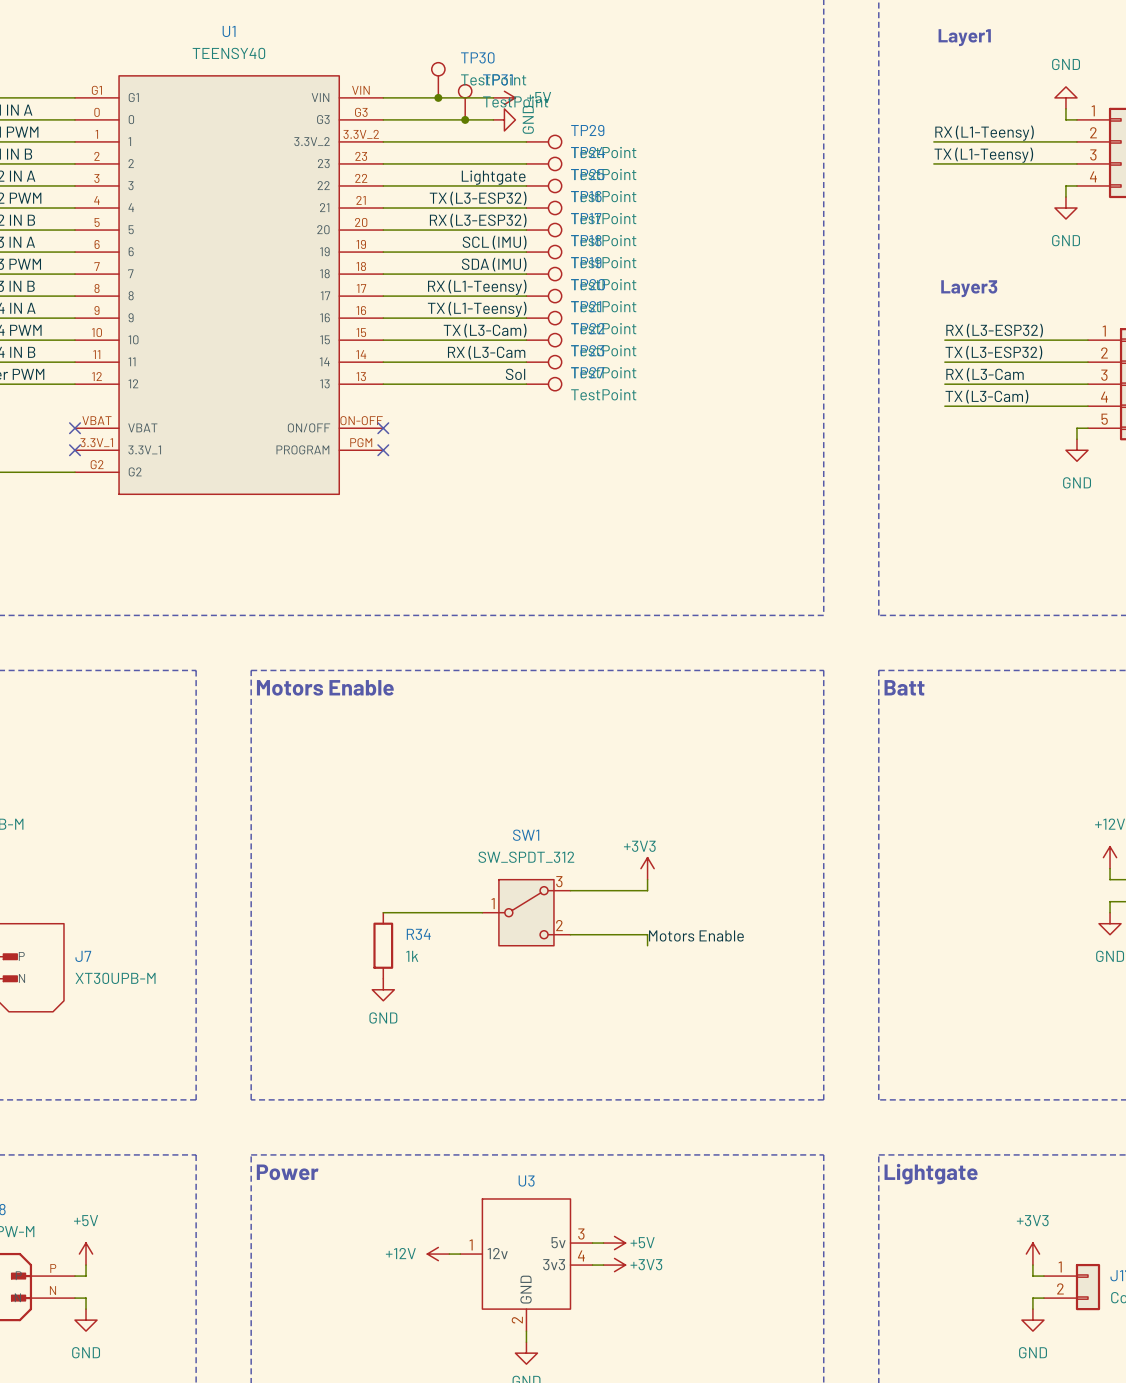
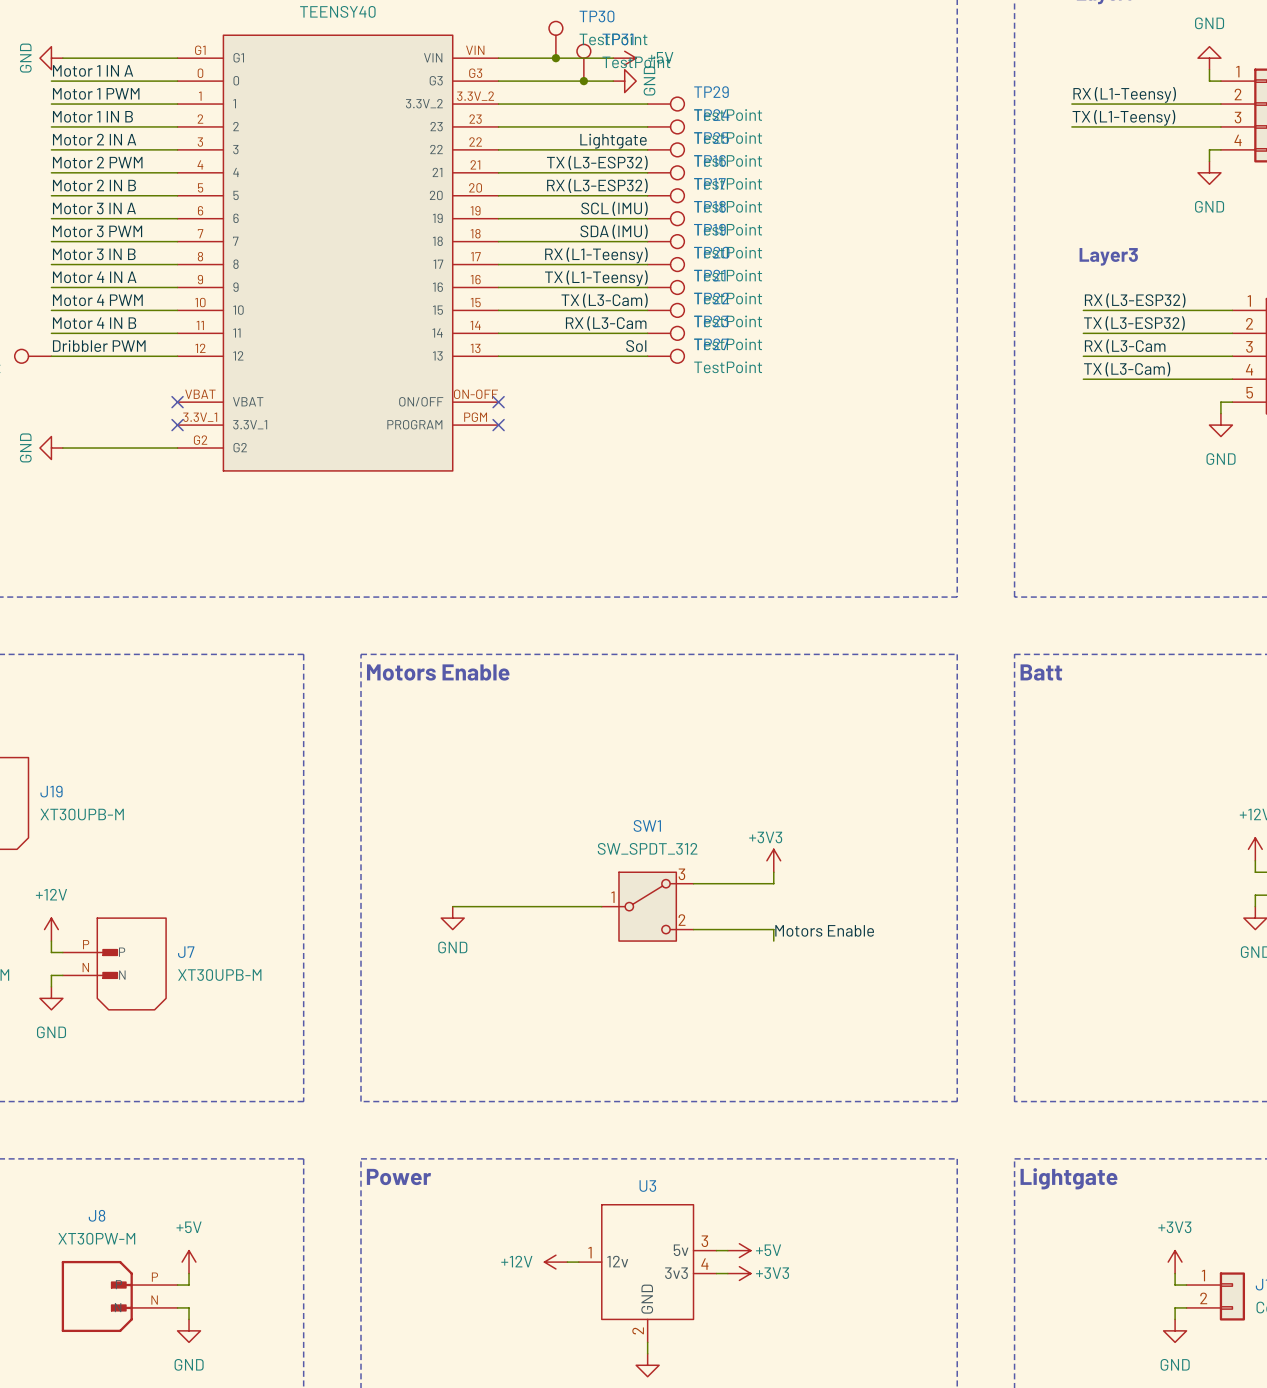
wire: none -> (452, 906) (498, 906)
R34: 1k (383, 945) -> none
power symbol position: GND (383, 989) -> GND (452, 918)

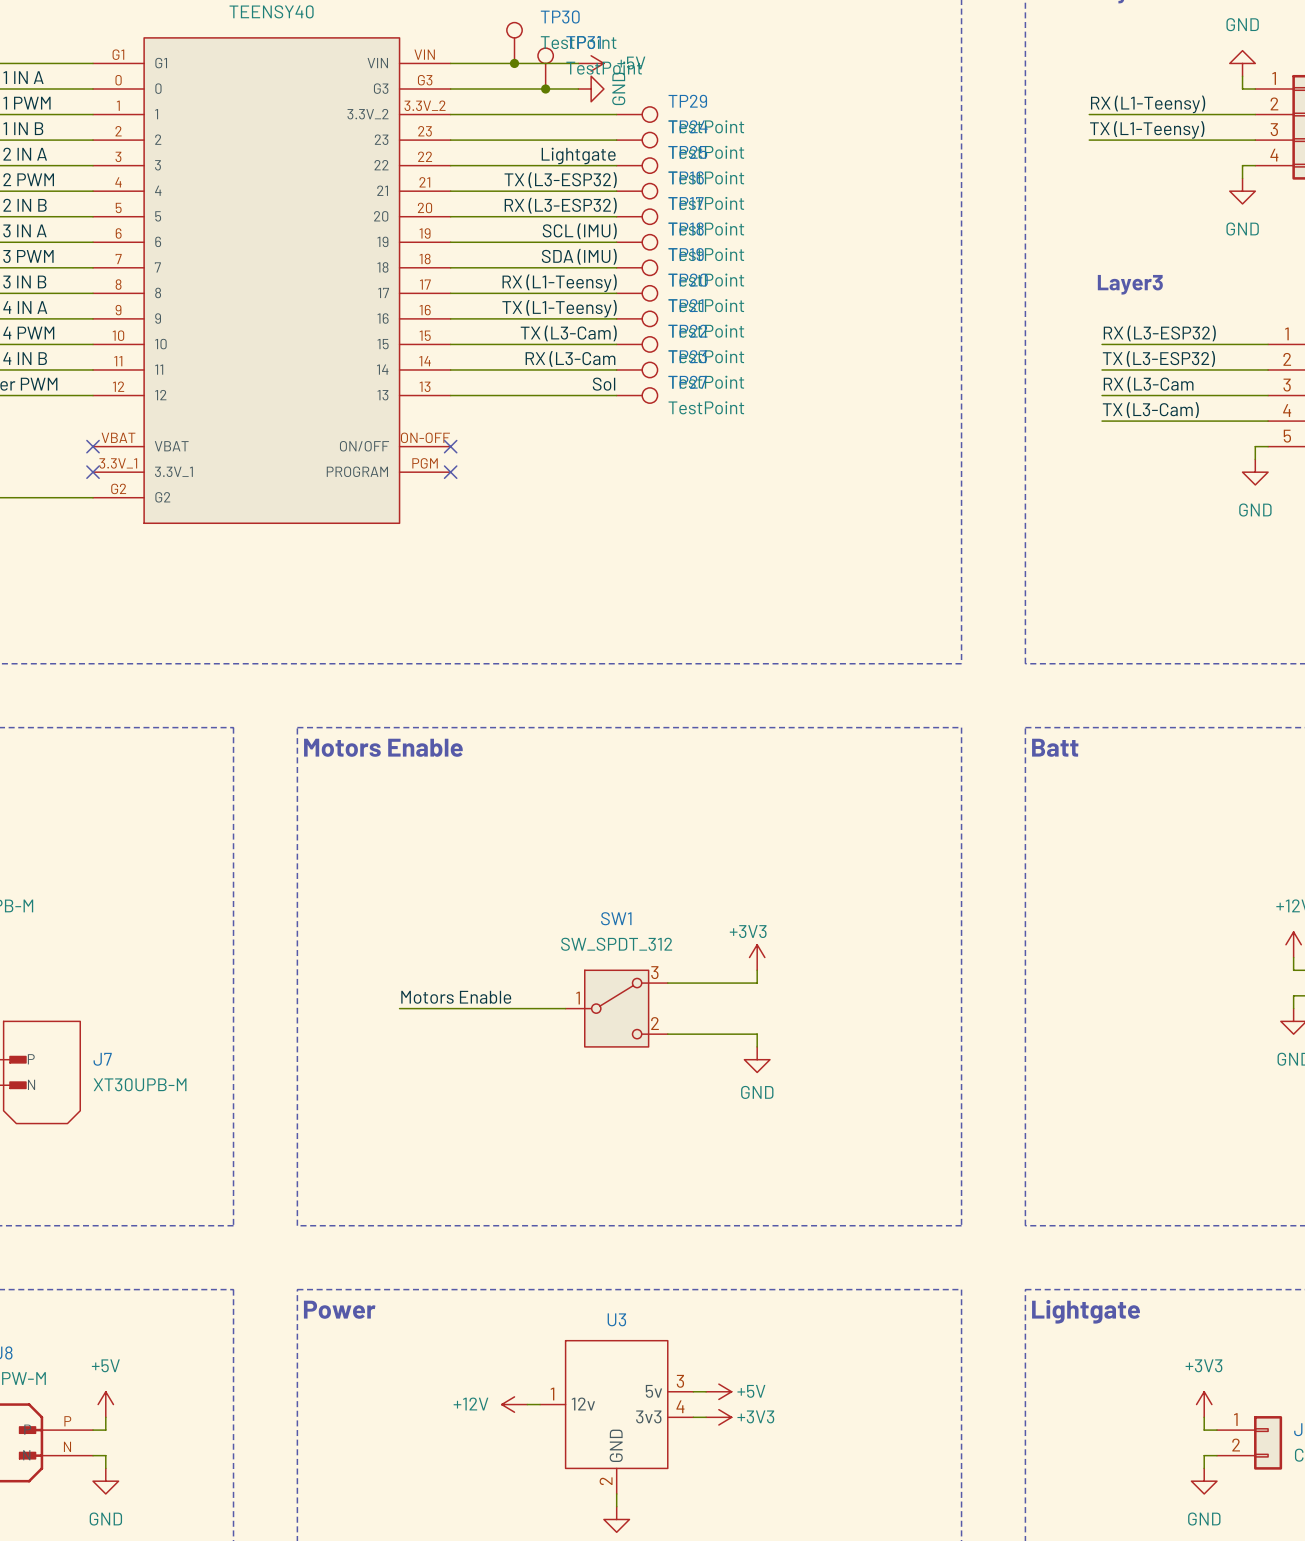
label: none -> Motors Enable (456, 997)
power symbol: GND (452, 918) -> none
label: Motors Enable (824, 930) -> none
power symbol: none -> GND (757, 1059)

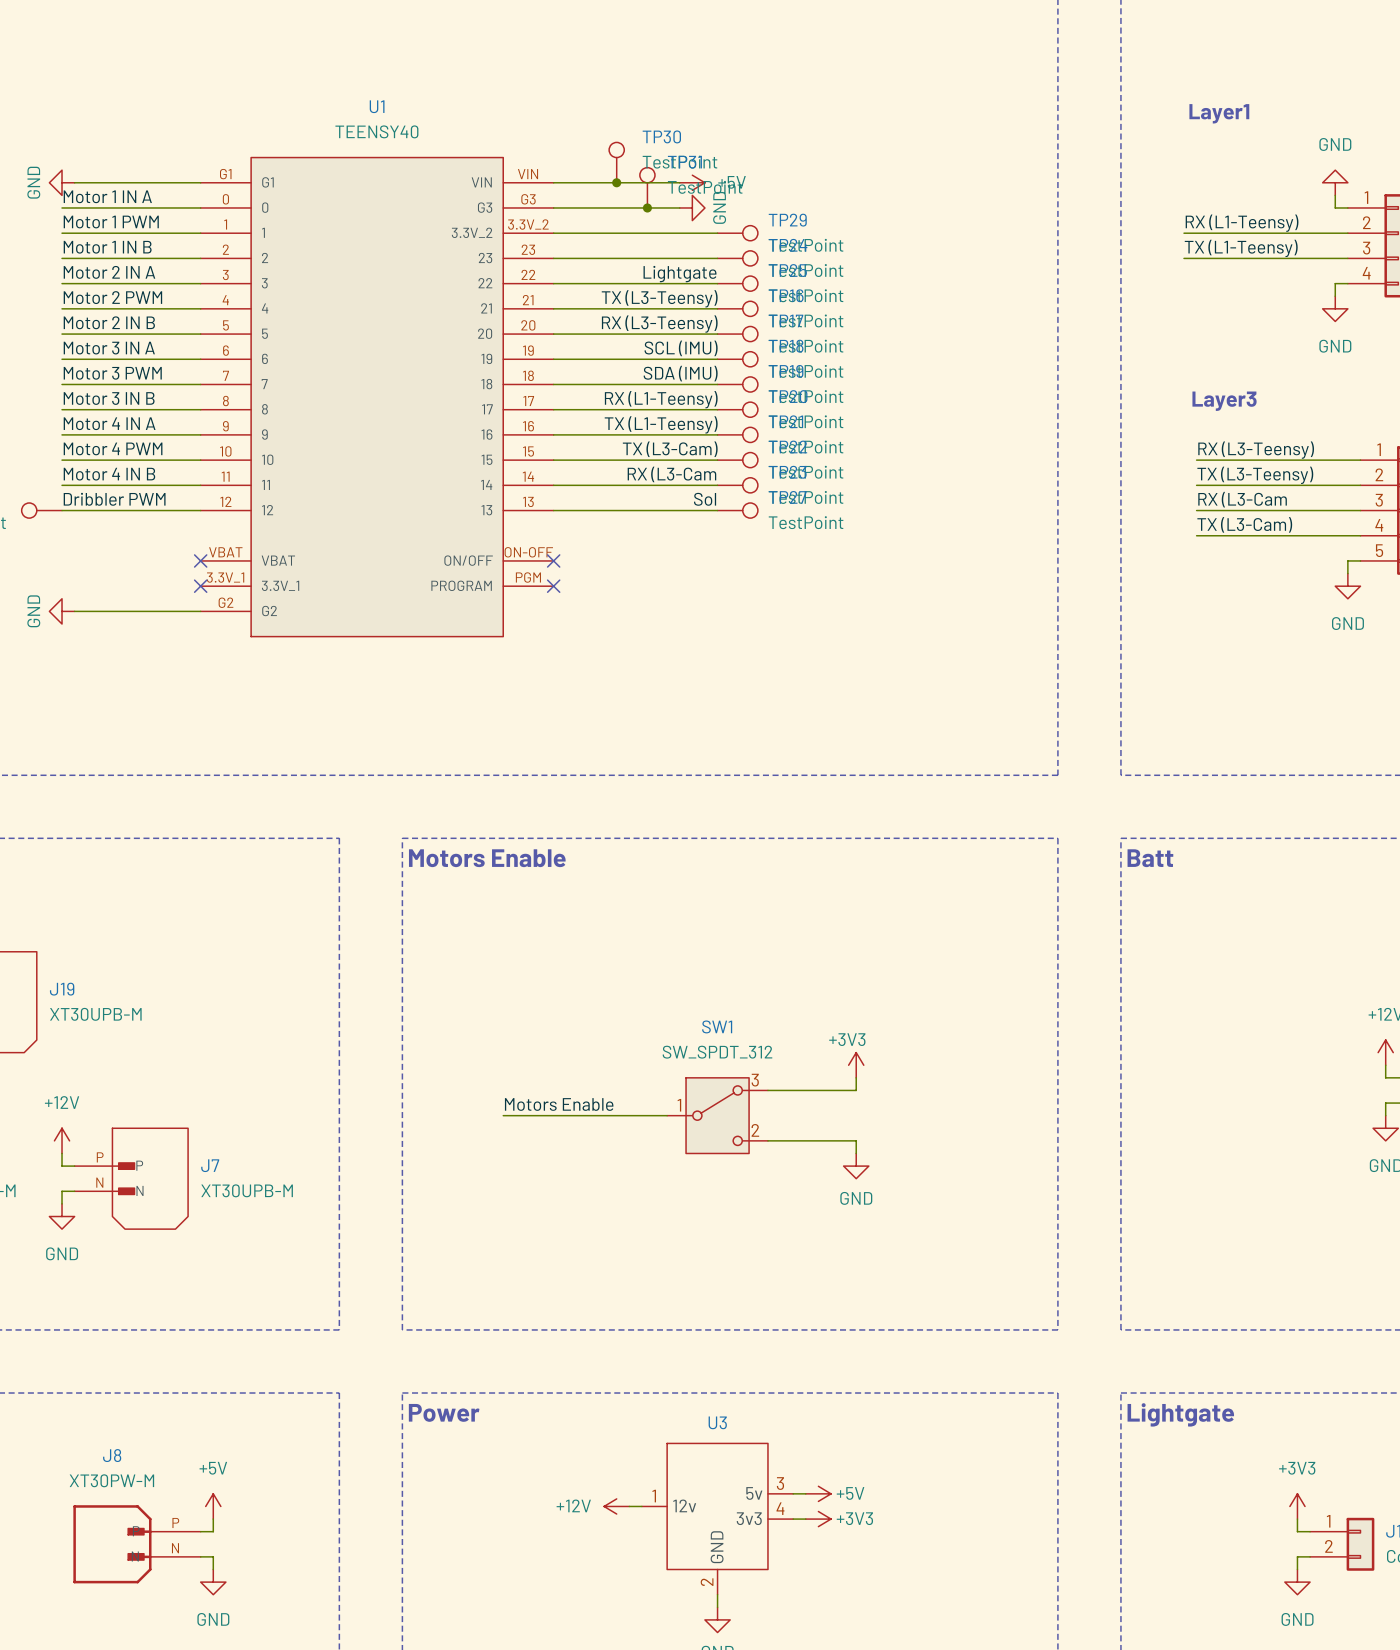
label: TX (L3-ESP32) (560, 180) -> TX (L3-Teensy) (659, 298)
label: RX (L3-ESP32) (560, 205) -> RX (L3-Teensy) (659, 324)
label: RX (L3-ESP32) (1159, 333) -> RX (L3-Teensy) (1256, 450)
label: TX (L3-ESP32) (1158, 358) -> TX (L3-Teensy) (1255, 475)

